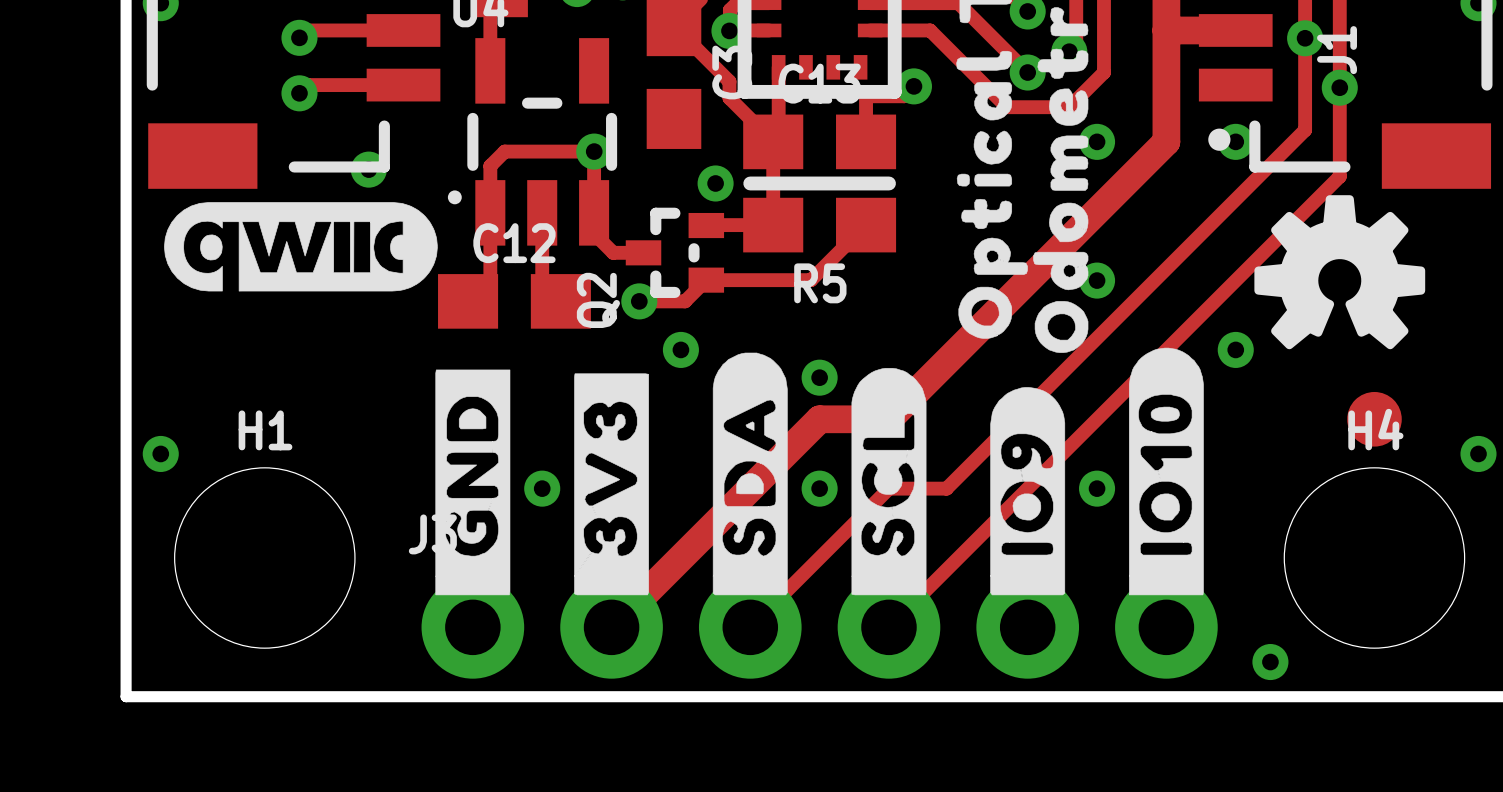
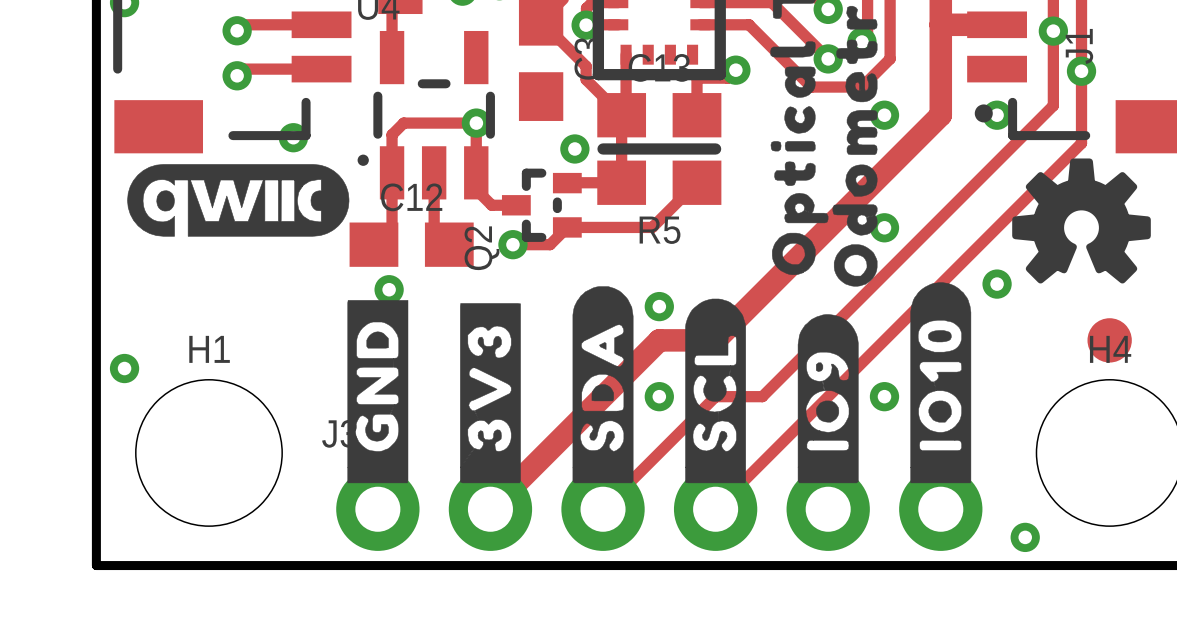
via: (680, 349) -> none
via: none -> (389, 289)
via: (542, 488) -> none

